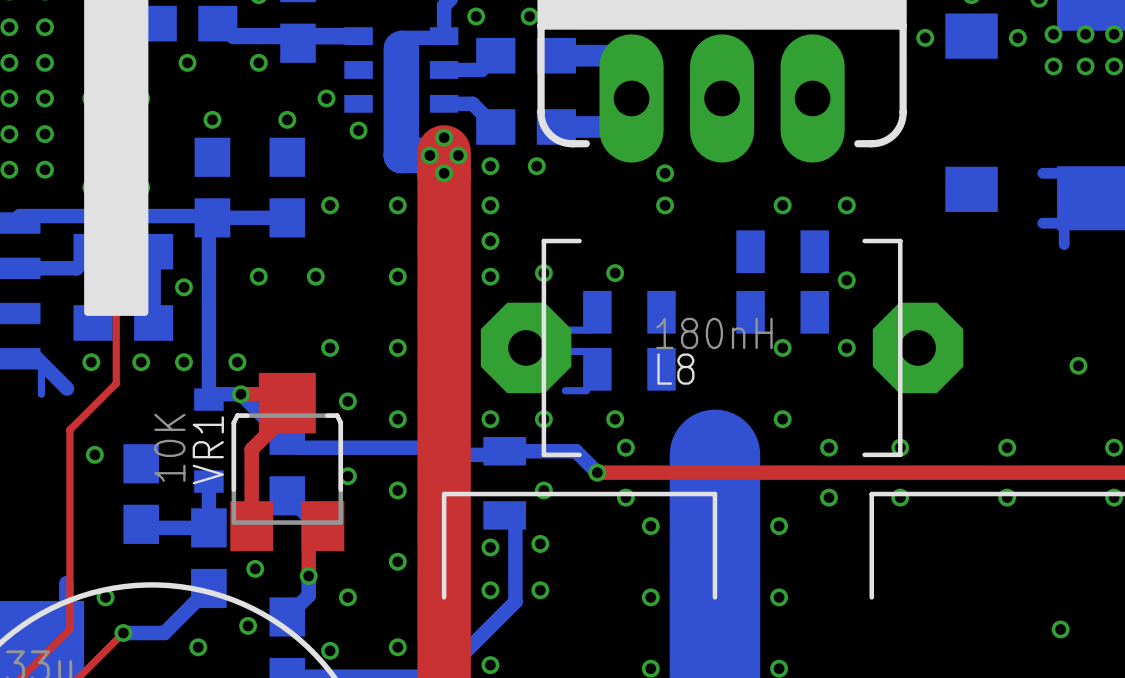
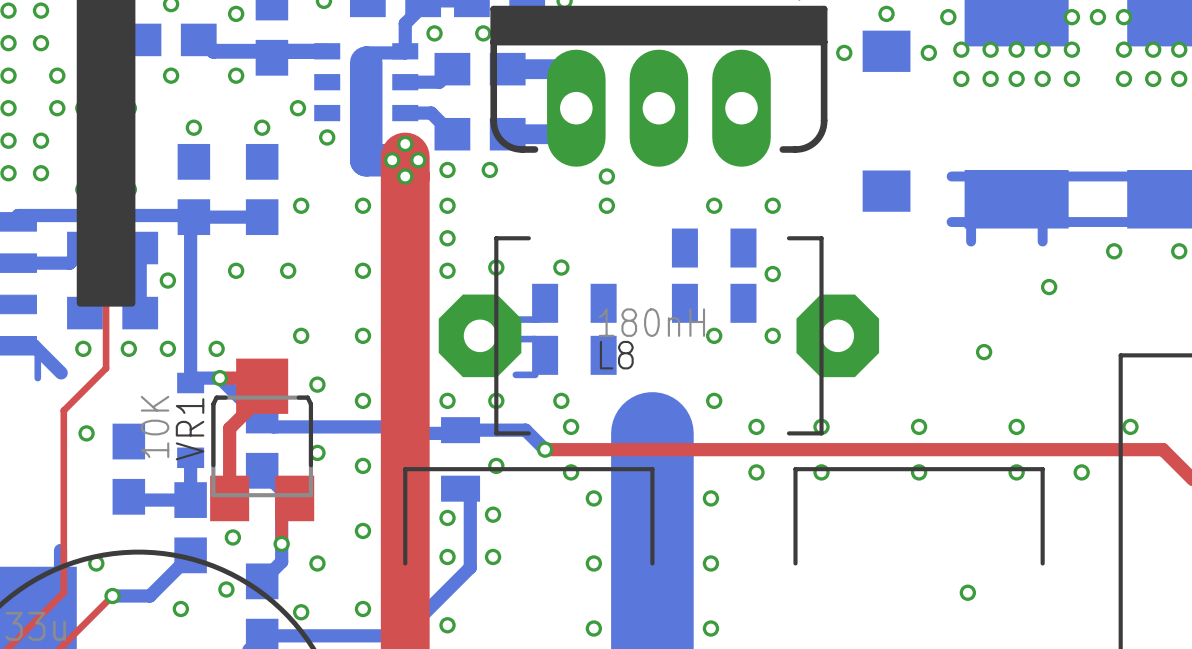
via position: (44, 62) -> (57, 75)
via position: (44, 98) -> (57, 108)

